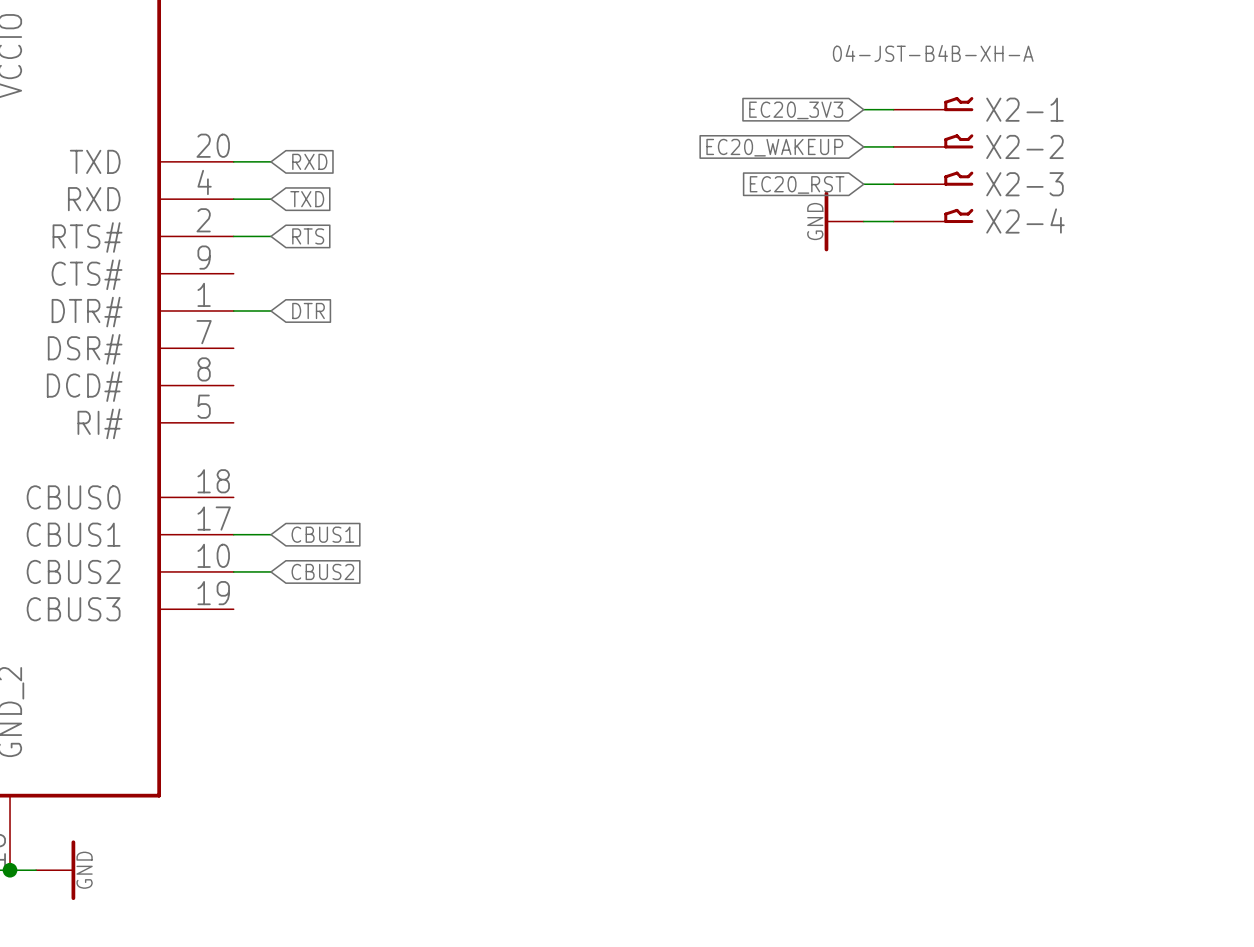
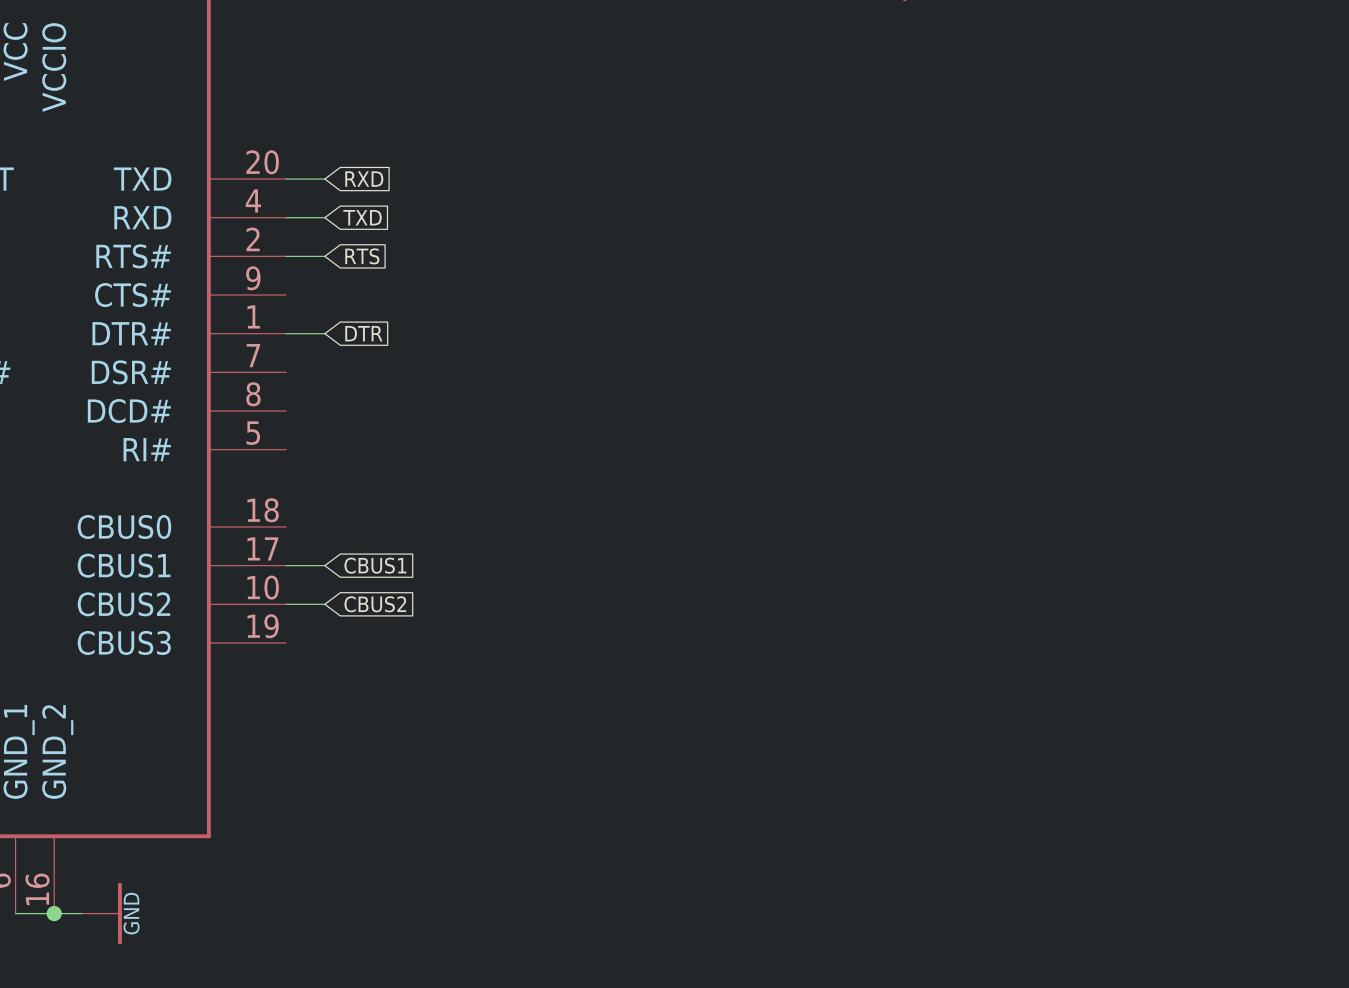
X2-1: 04-JST-B4B-XH-A (933, 104) -> none
wire: (863, 109) (893, 109) -> none
global label: EC20_3V3 (796, 110) -> none
X2-2: (933, 141) -> none
wire: (863, 146) (893, 146) -> none
global label: EC20_WAKEUP (774, 147) -> none
X2-3: (933, 178) -> none
global label: EC20_RST (797, 184) -> none
wire: (863, 184) (893, 184) -> none
X2-4: (933, 215) -> none
power symbol: GND (844, 221) -> none
wire: (863, 221) (893, 221) -> none

